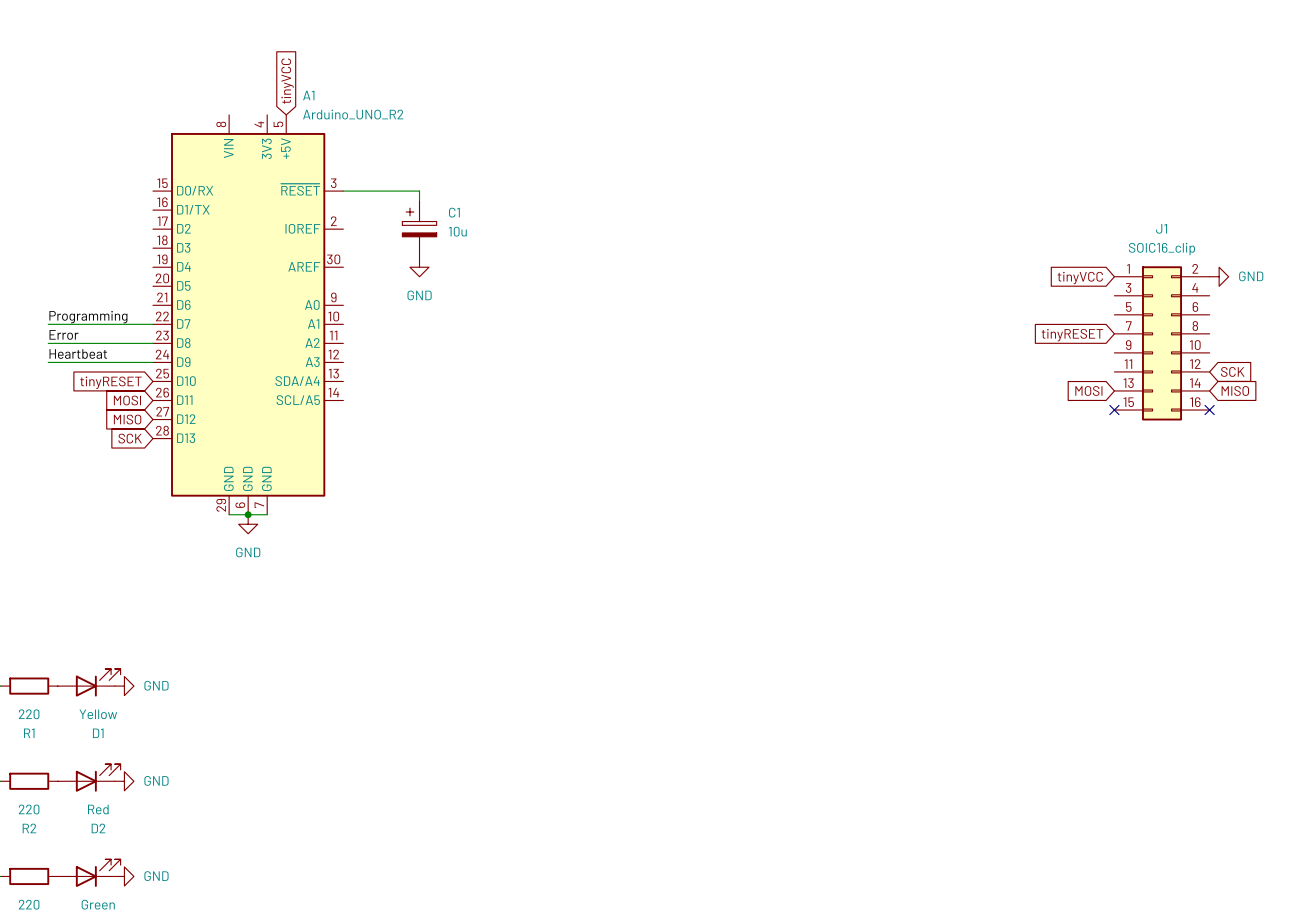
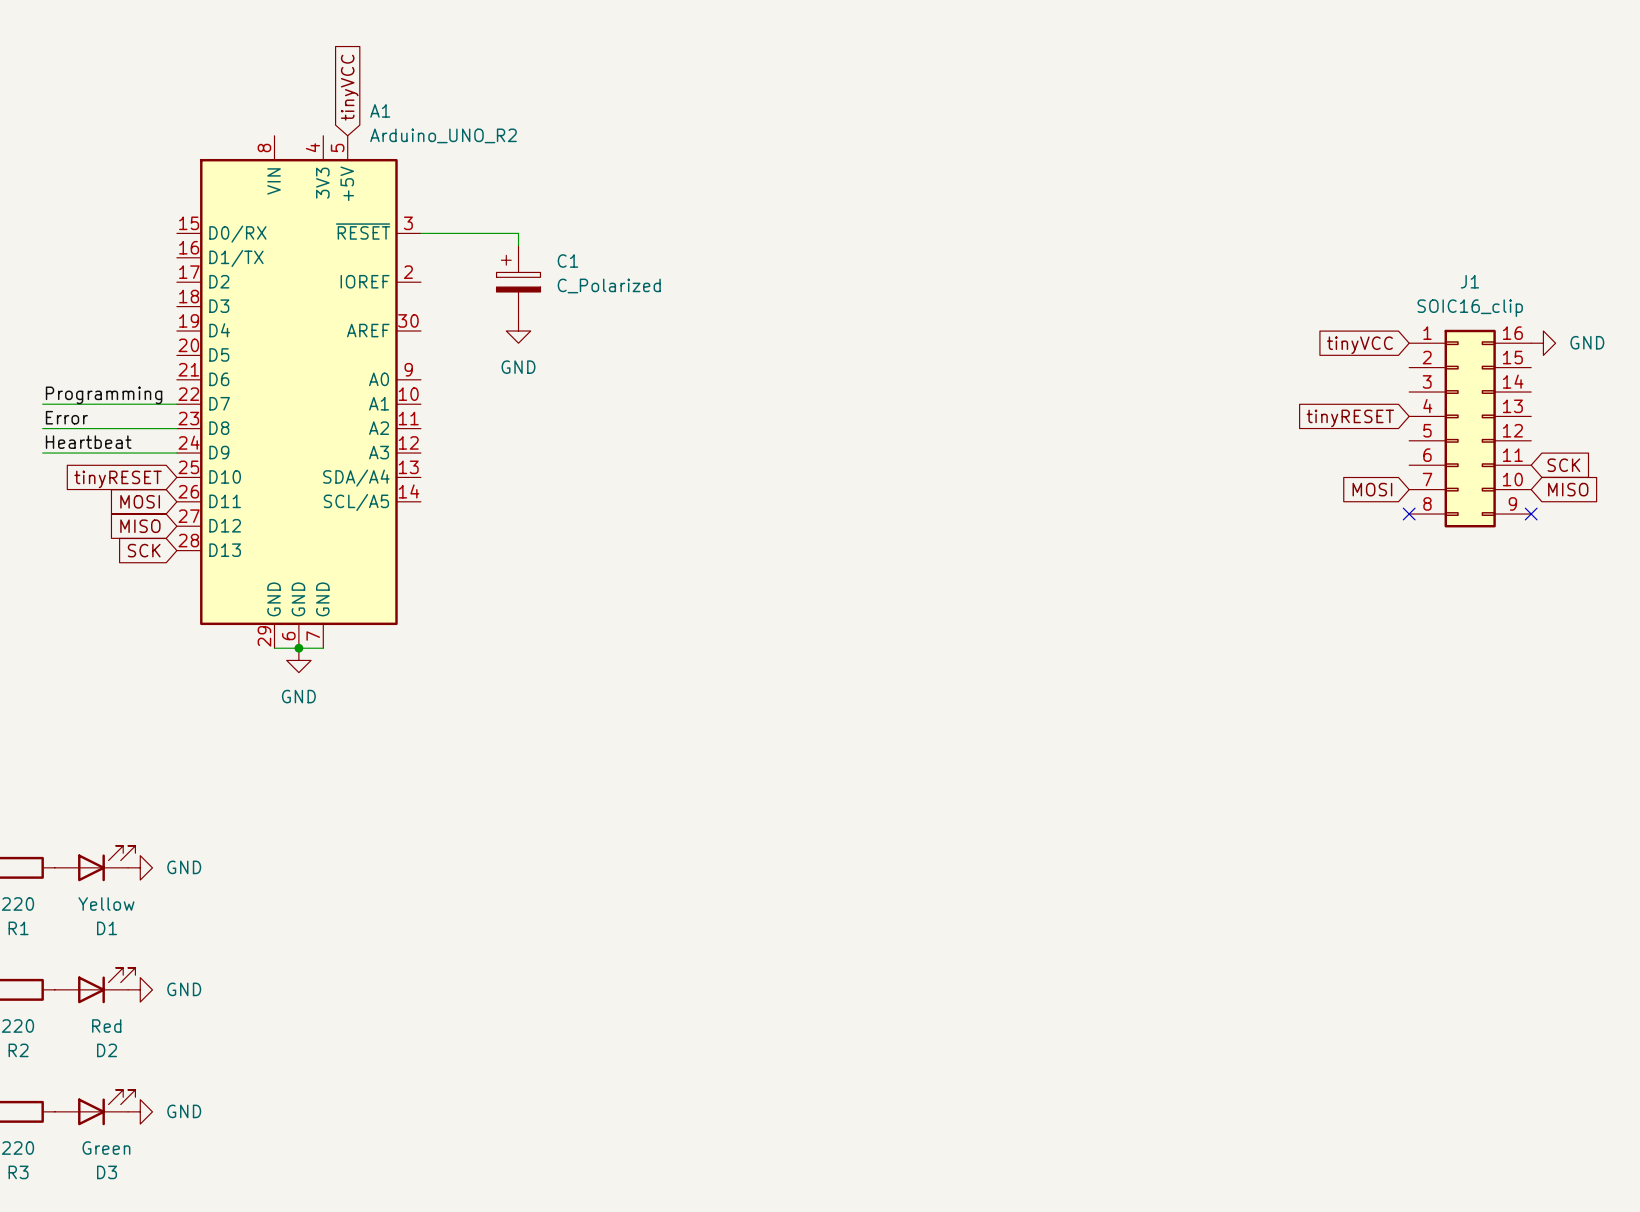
C1 value: 10u (457, 231) -> C_Polarized (609, 285)
J1 symbol: [1114, 266, 1210, 421] -> [1409, 329, 1532, 528]

